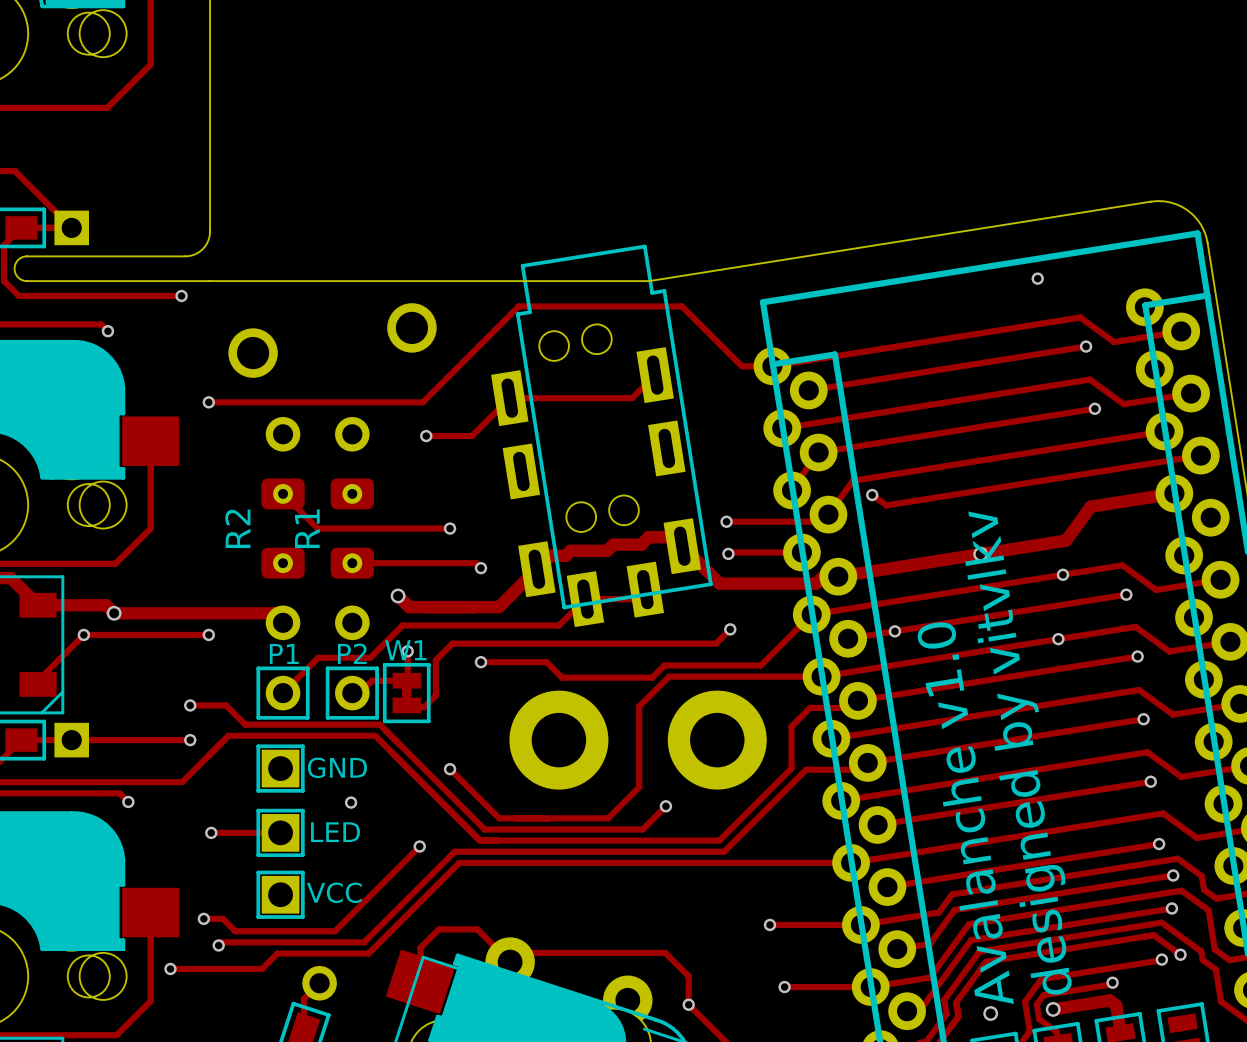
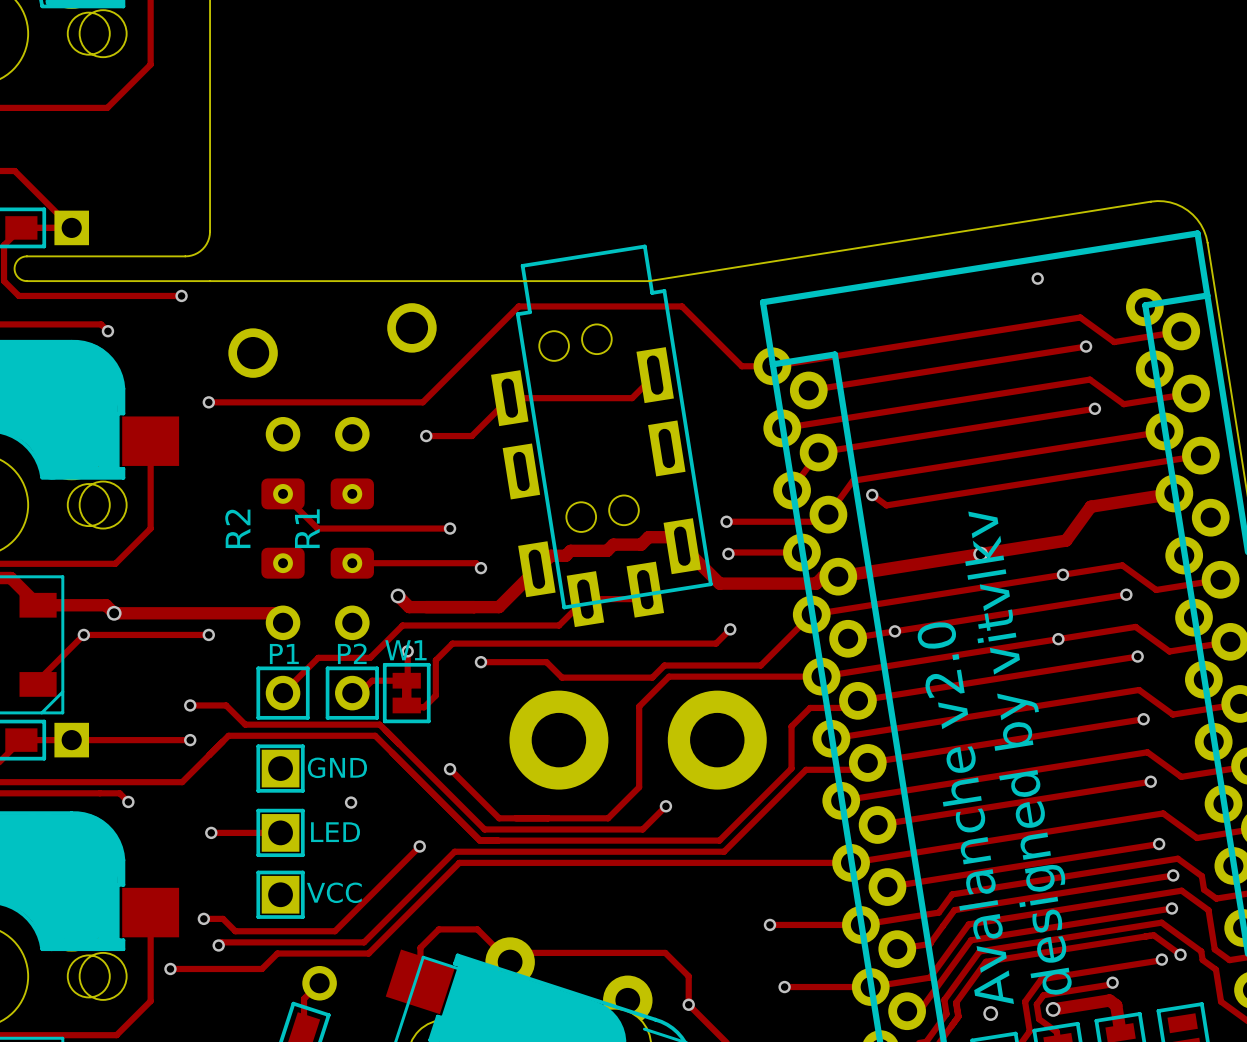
text: Avalanche v1.0 (965, 812) -> Avalanche v2.0 (965, 812)

